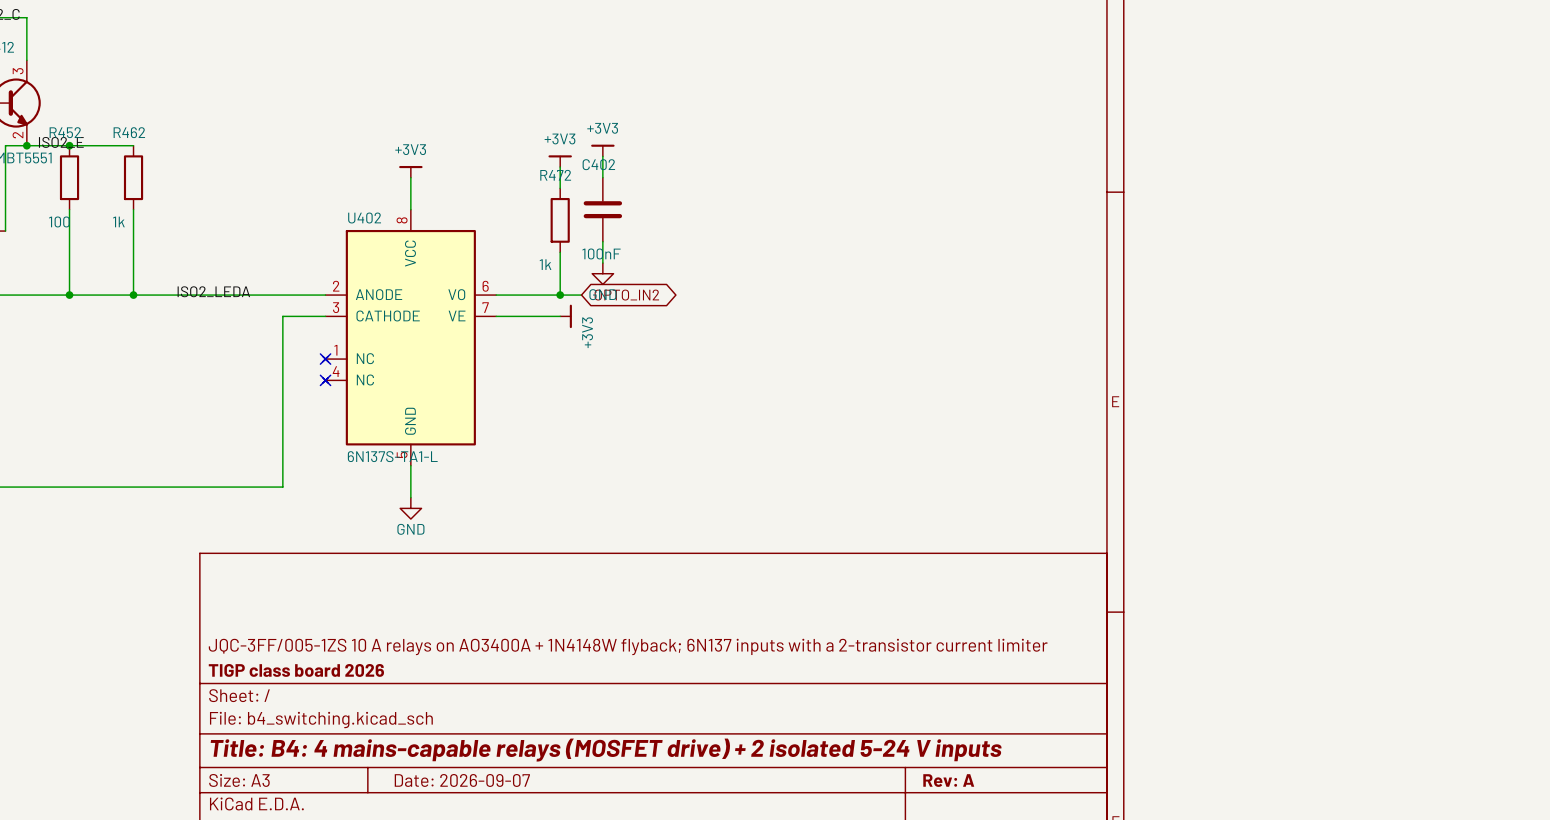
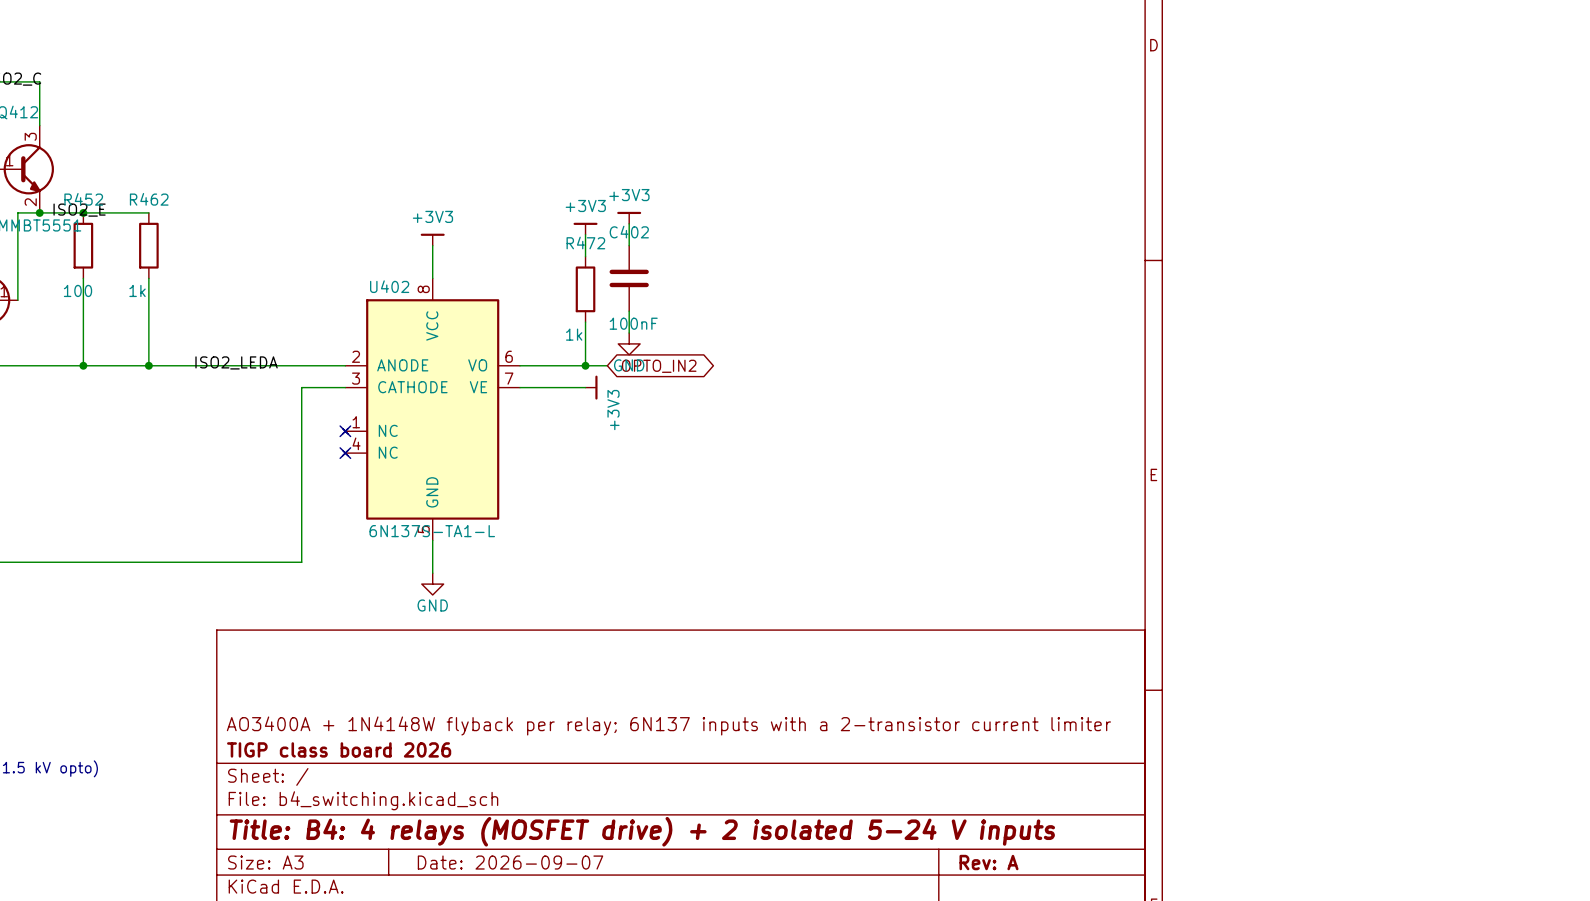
title block: JQC-3FF/005-1ZS 10 A relays on AO3400A + 1N4148W flyback; 6N137 inputs with a 2-transistor current limiter (628, 646) -> AO3400A + 1N4148W flyback per relay; 6N137 inputs with a 2-transistor current limiter (668, 725)
title block: Title: B4: 4 mains-capable relays (MOSFET drive) + 2 isolated 5-24 V inputs (606, 750) -> Title: B4: 4 relays (MOSFET drive) + 2 isolated 5-24 V inputs (642, 831)

